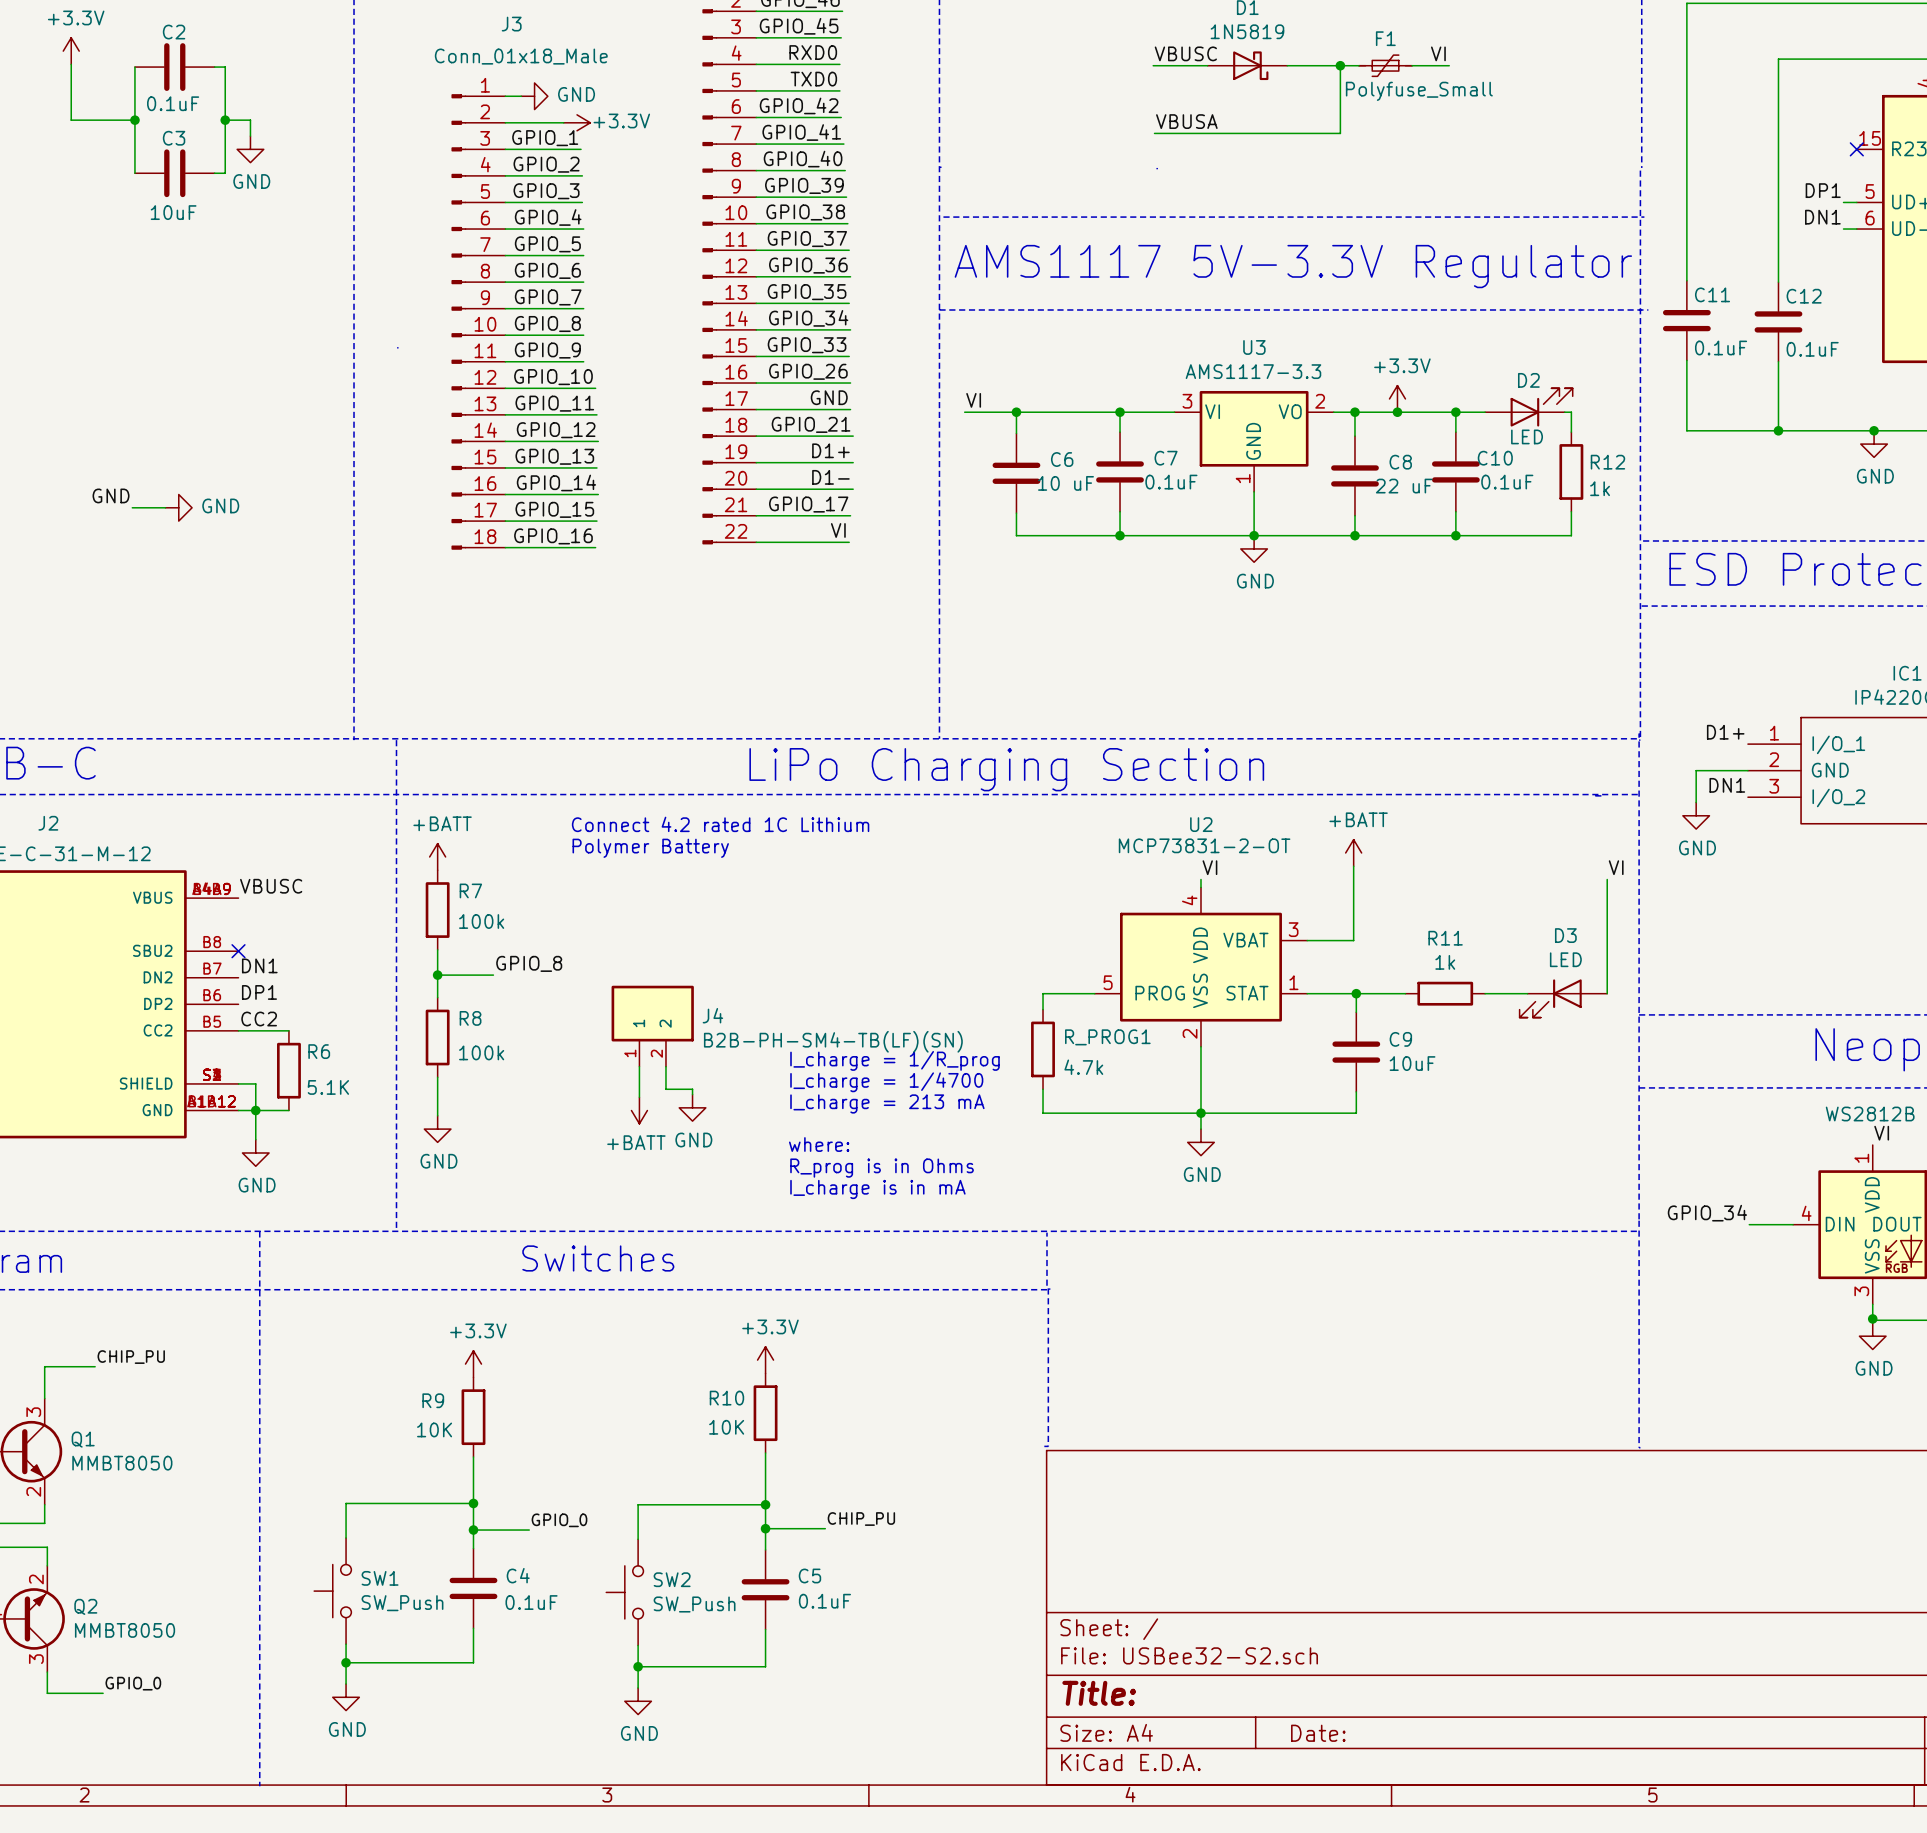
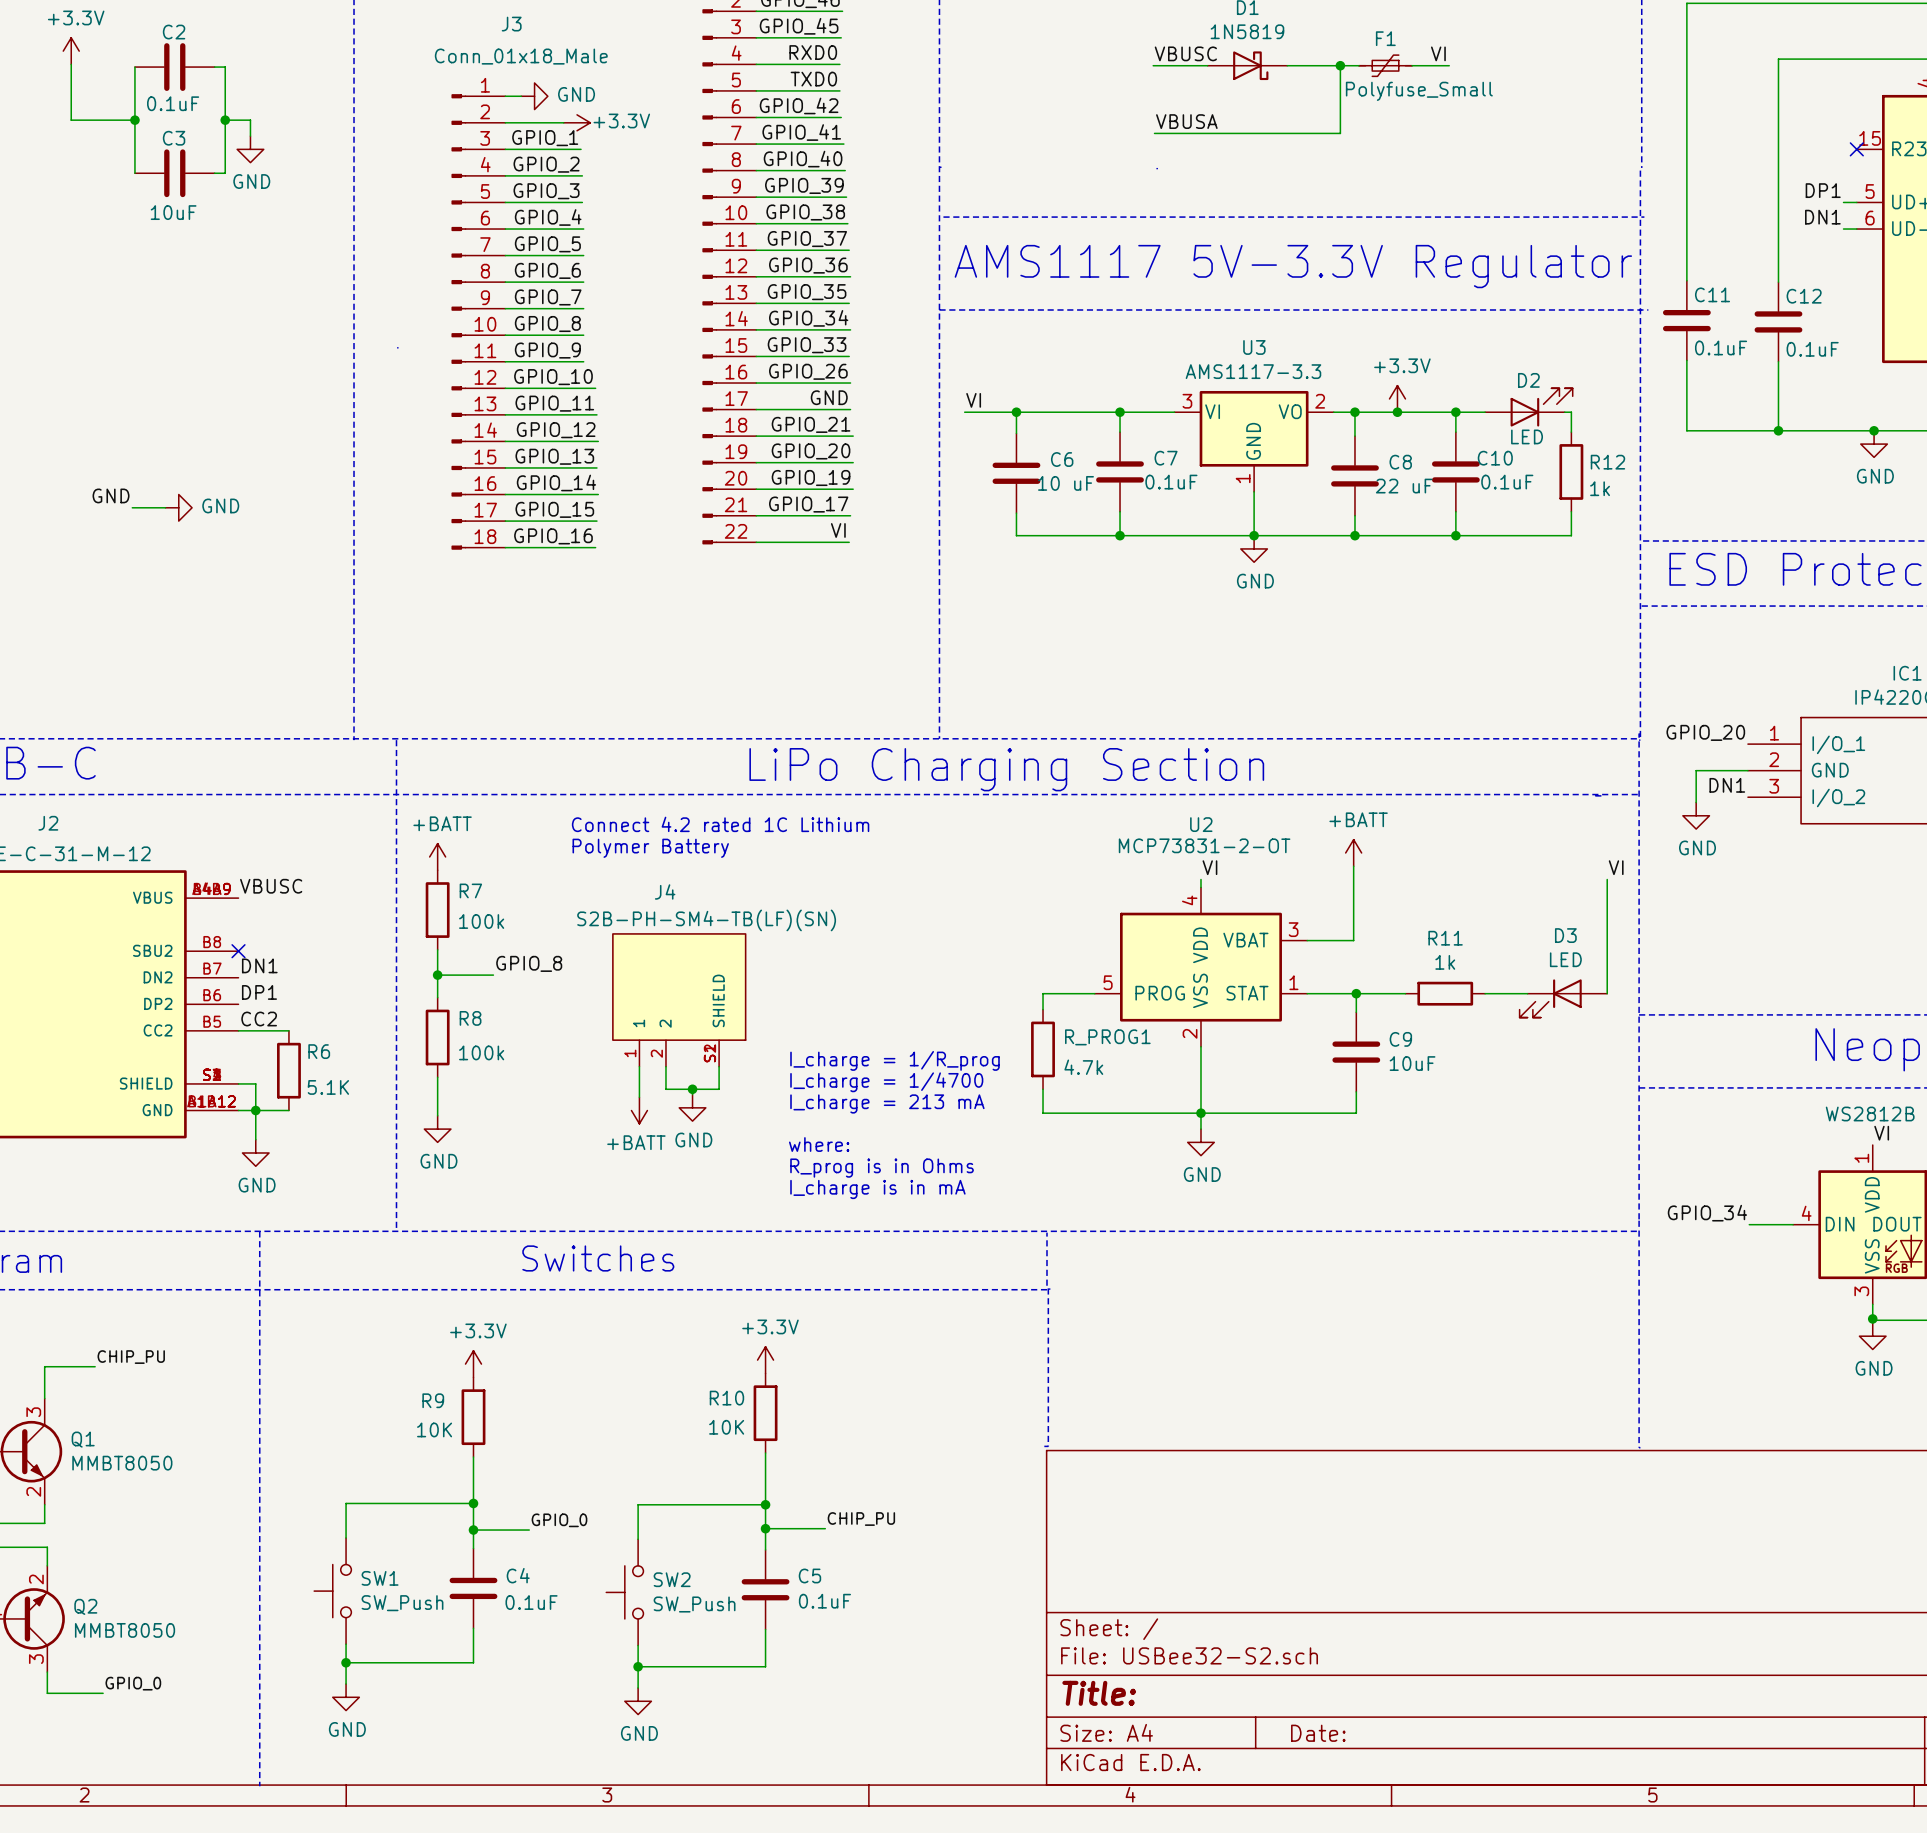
label: D1+ (830, 450) -> GPIO_20 (811, 451)
label: D1- (830, 477) -> GPIO_19 (811, 478)
label: D1+ (1725, 732) -> GPIO_20 (1705, 732)
J4 symbol: [611, 985, 694, 1067] -> [612, 933, 747, 1067]
J4 name position: J4 (712, 1015) -> J4 (665, 891)
J4 value: B2B-PH-SM4-TB(LF)(SN) (833, 1041) -> S2B-PH-SM4-TB(LF)(SN) (706, 920)
wire: none -> (719, 1066) (719, 1089) (692, 1089)
junction: none -> (692, 1089)

